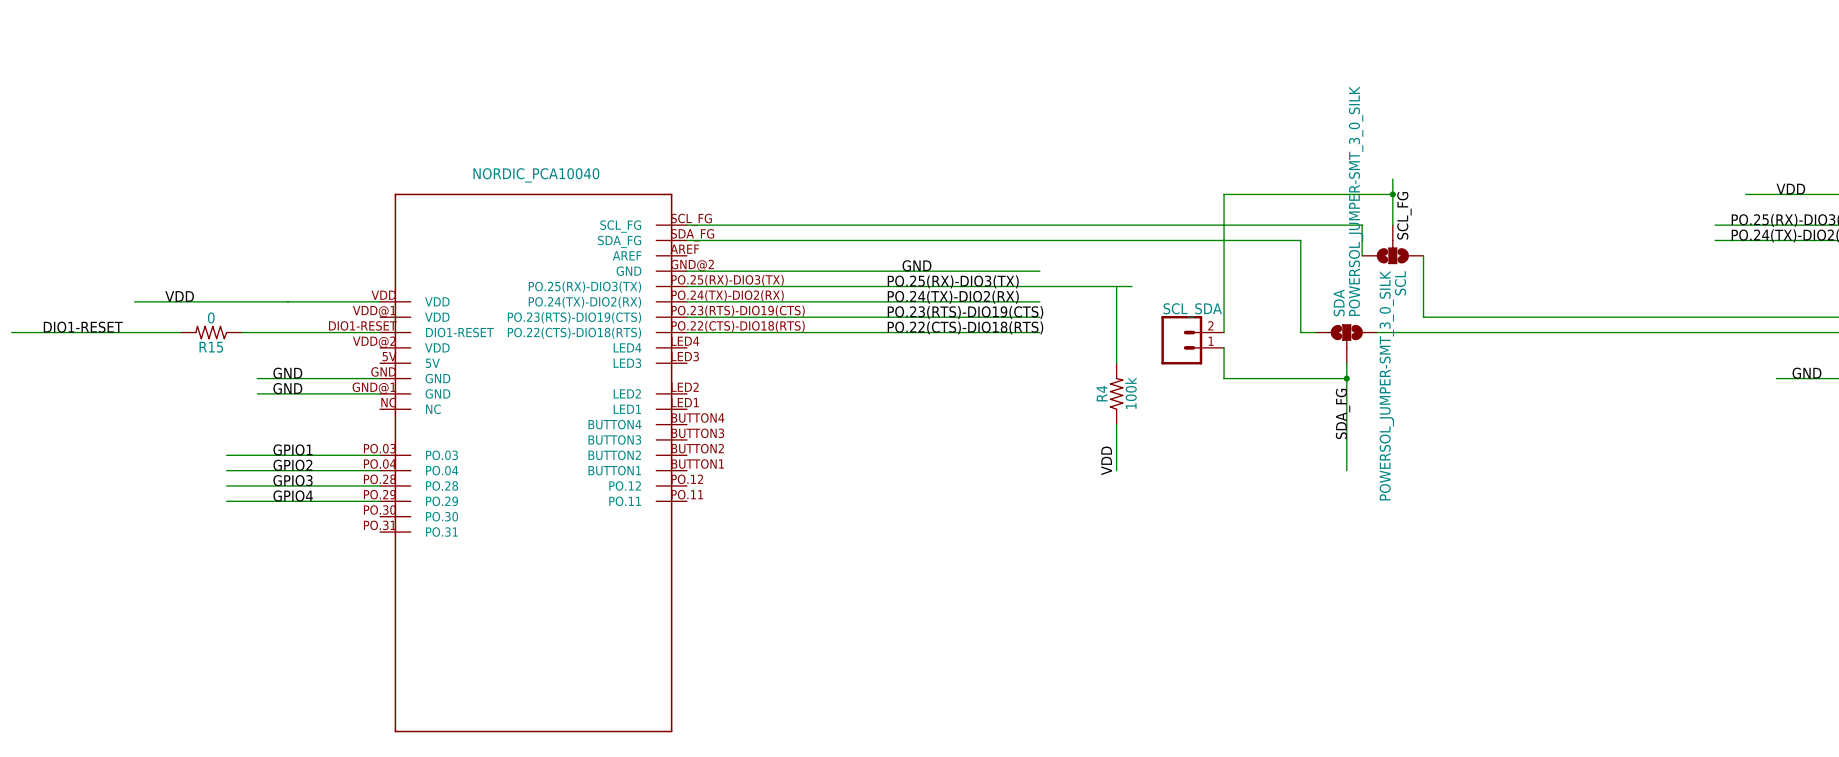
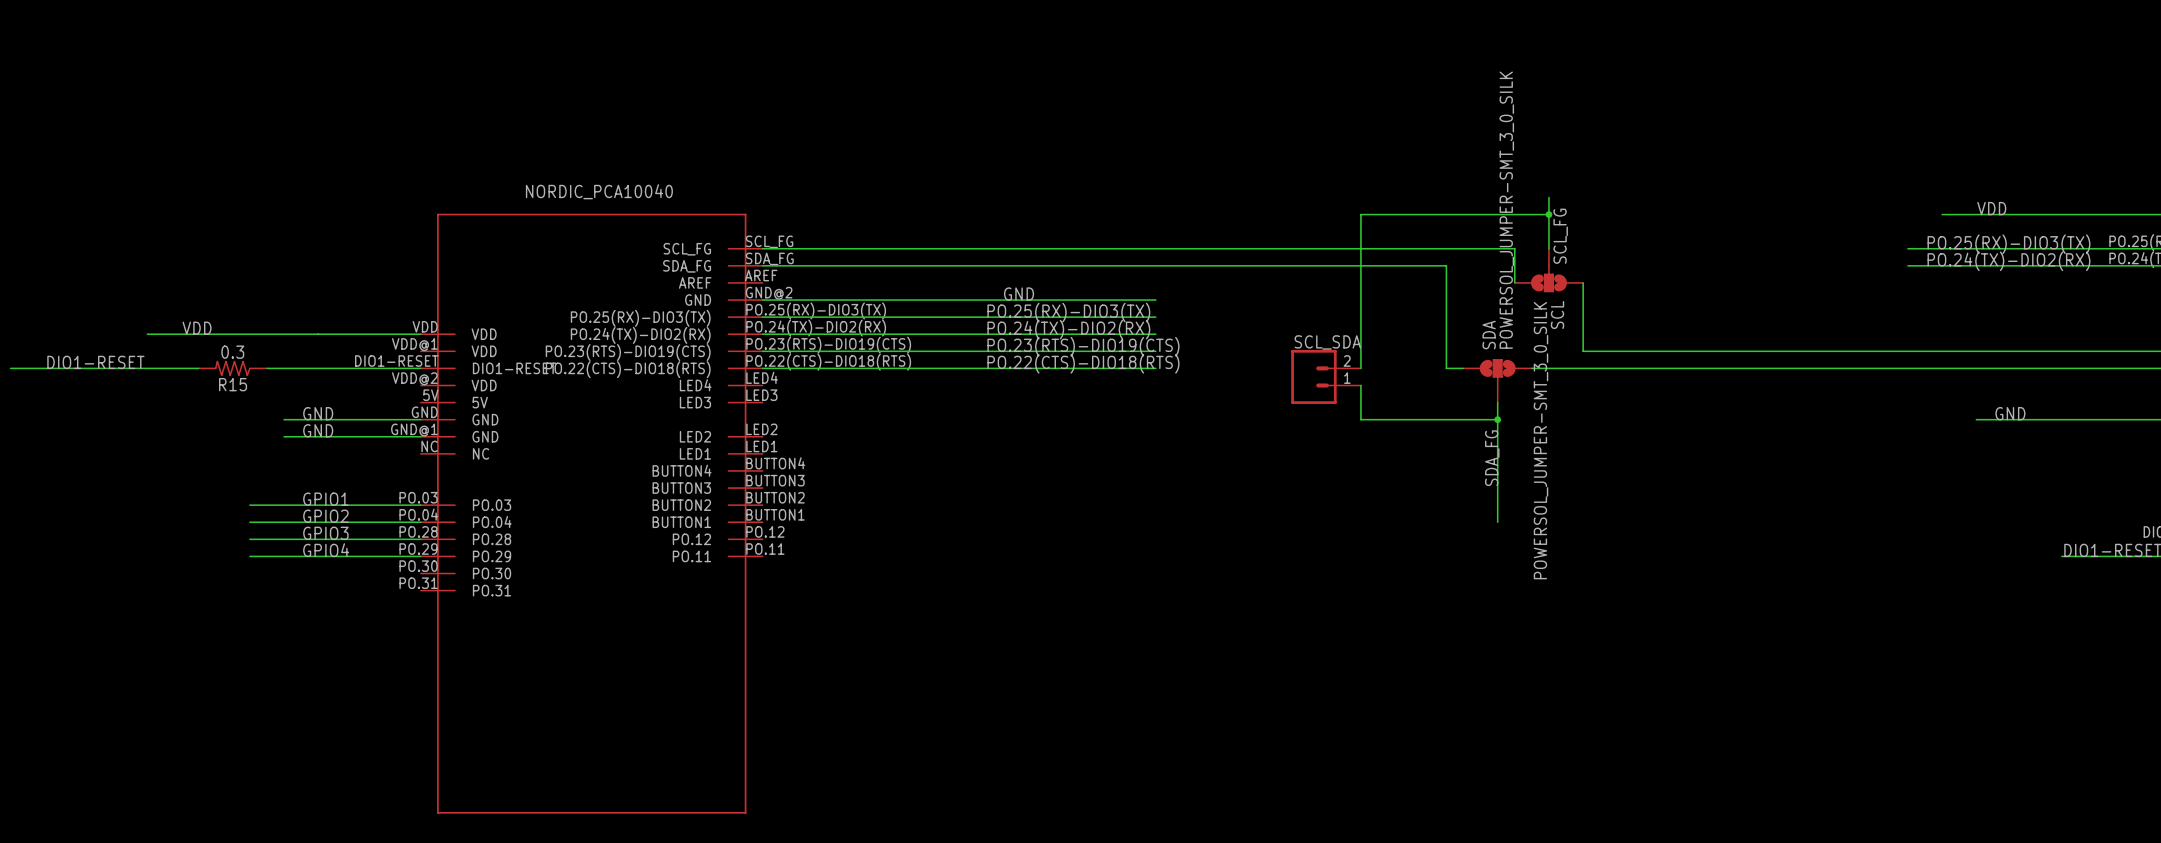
wire: (1039, 286) (1131, 286) -> none
wire: (1116, 286) (1116, 363) -> none
R15 value: 0 (211, 317) -> 0.3 (232, 352)
R4: 100k (1116, 393) -> none
wire: (1116, 424) (1116, 470) -> none
label: VDD (1106, 460) -> none

